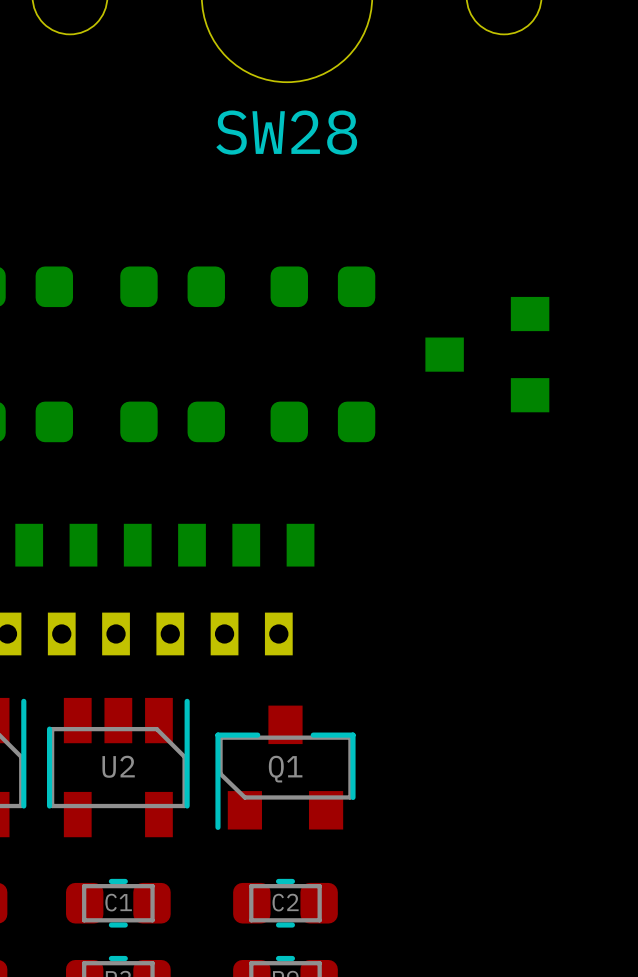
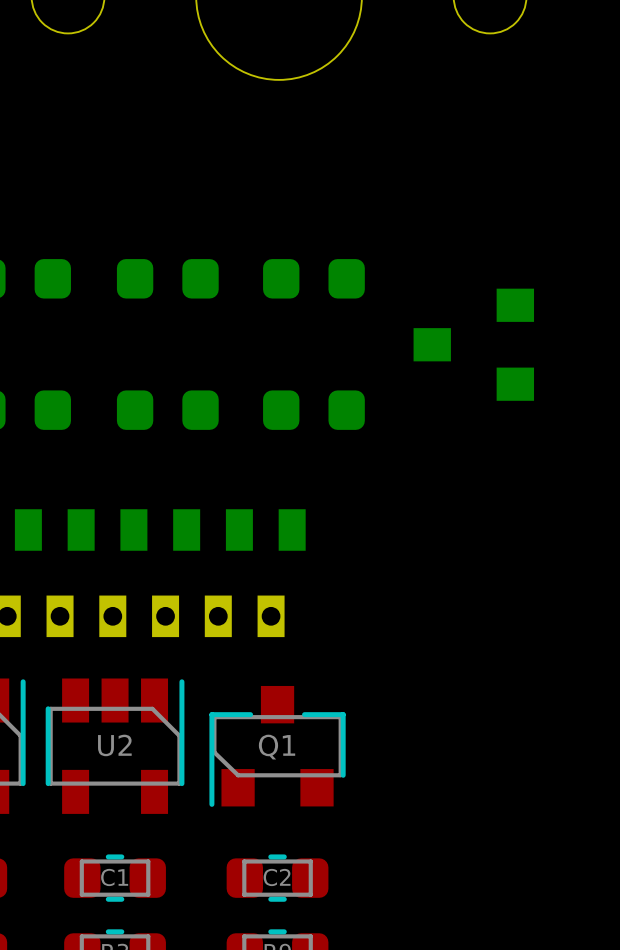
SW28 name: SW28 (286, 132) -> none

